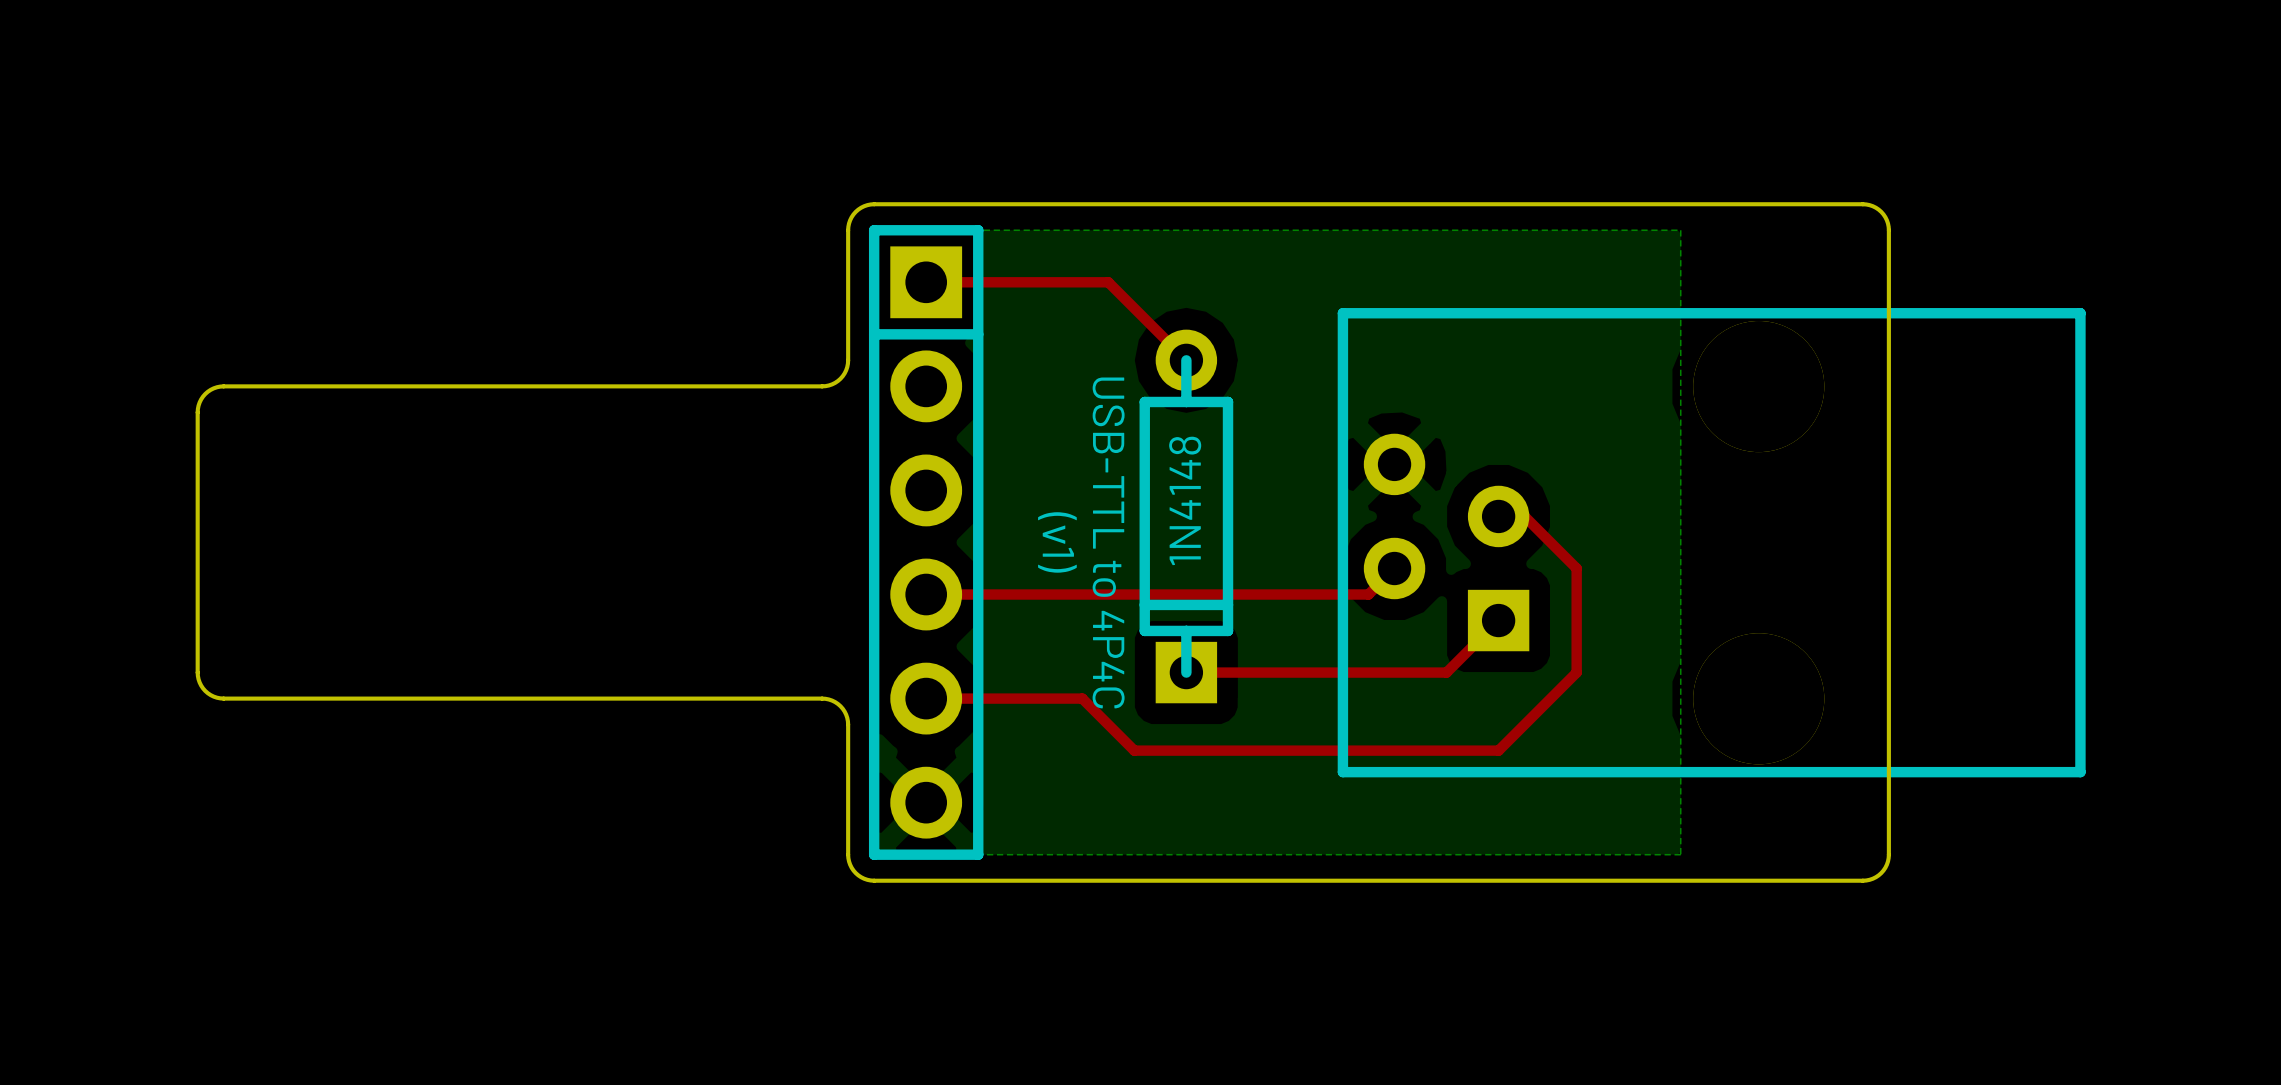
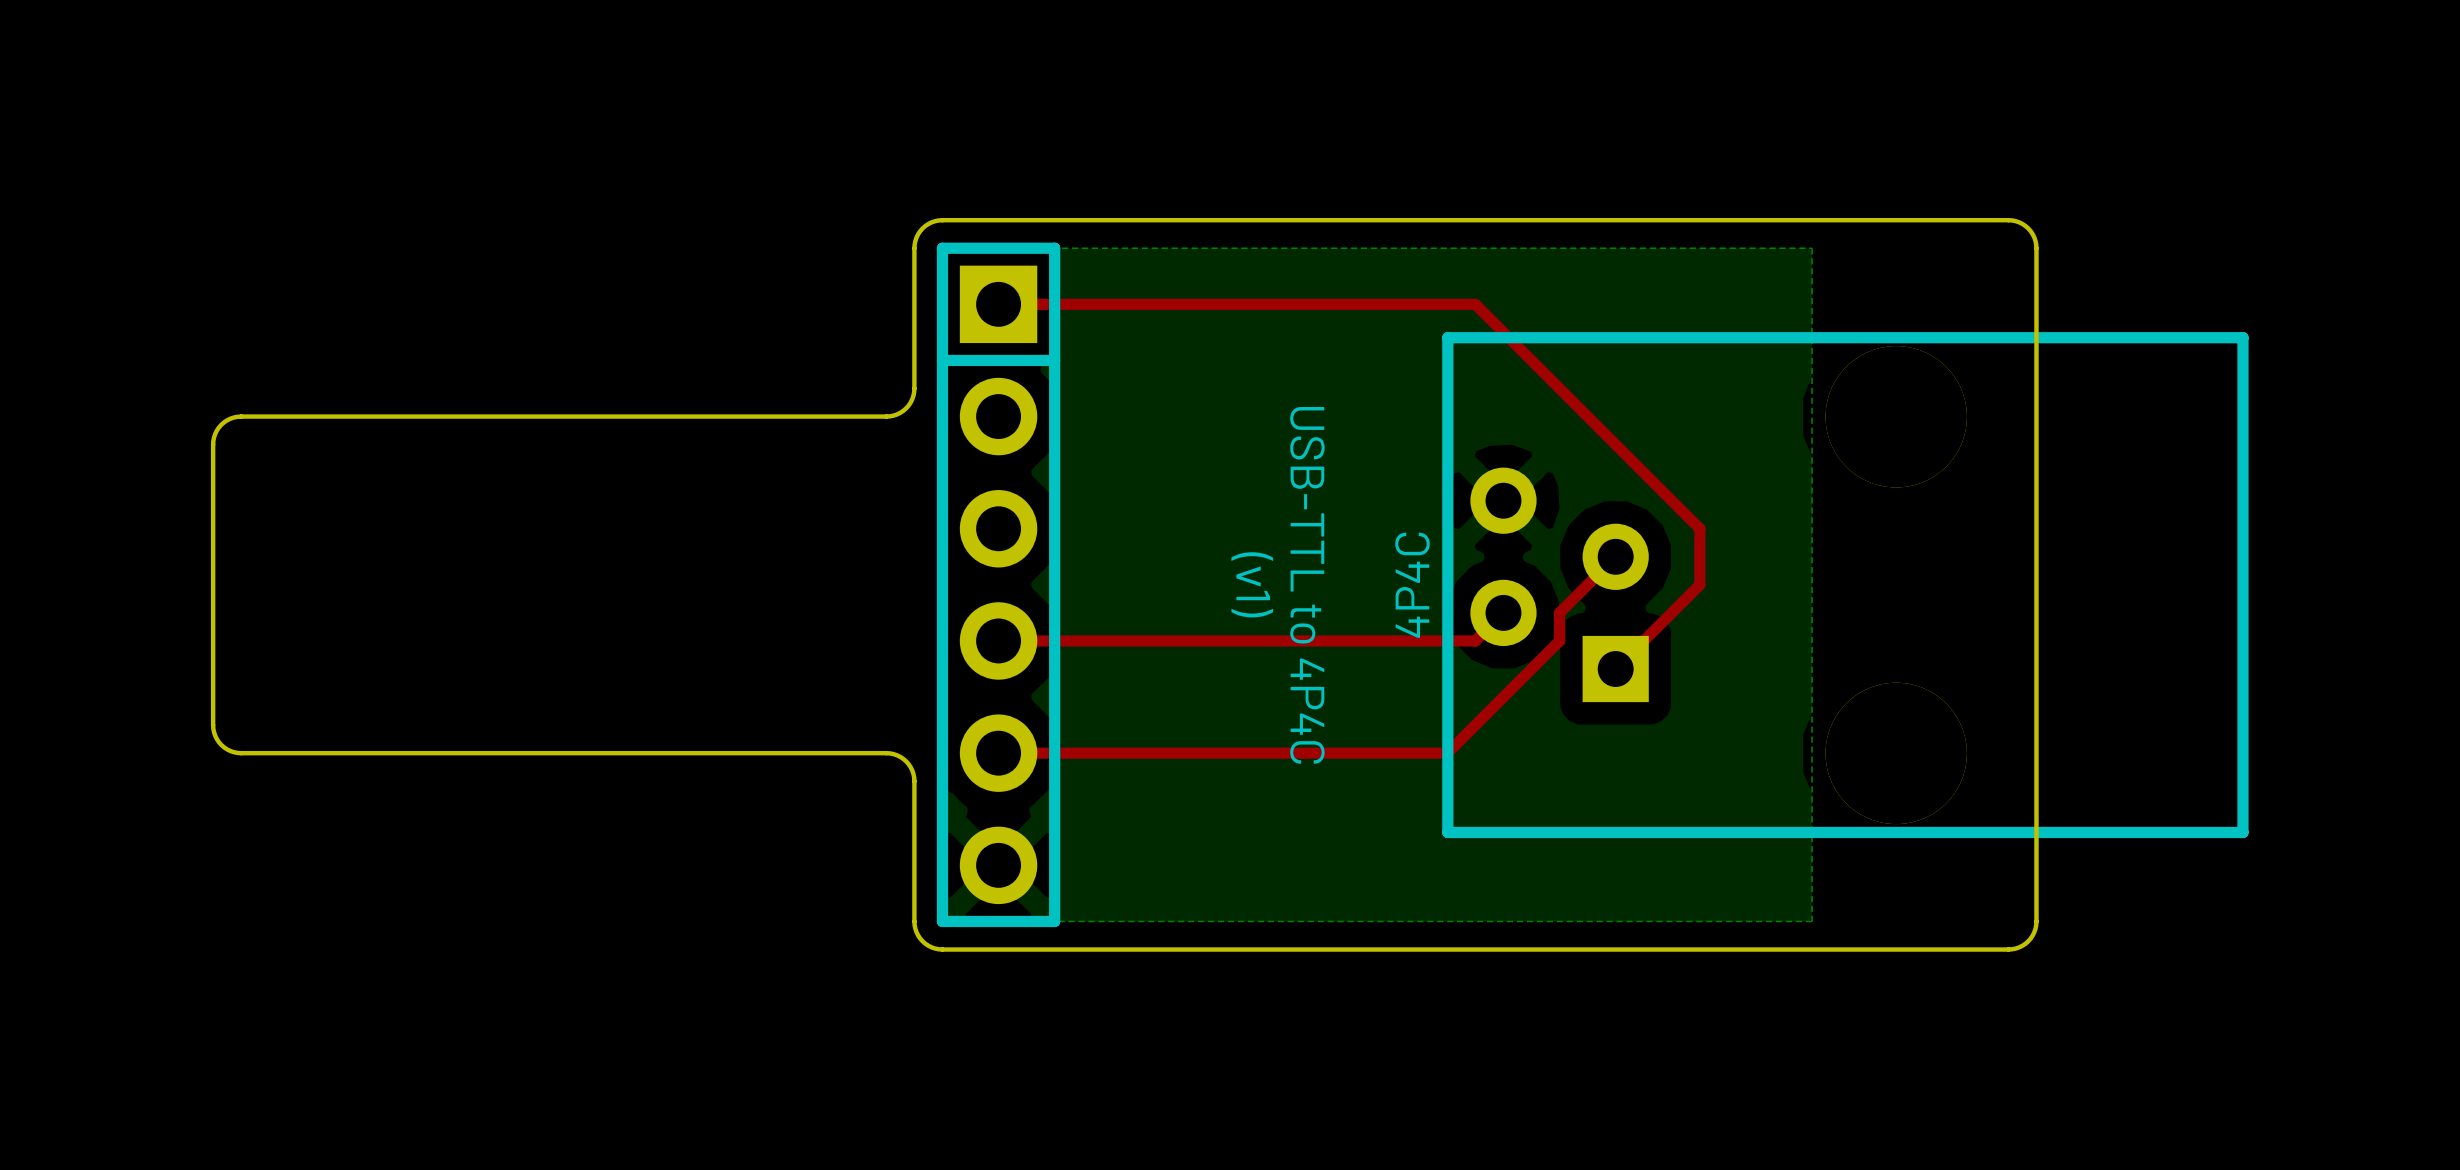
top track: (1108, 282) (1186, 360) -> none
part: 1N4148 (1186, 516) -> none
top track: (1498, 516) (1524, 516) (1576, 568) (1576, 672) (1498, 750) (1134, 750) (1082, 698) -> (1615, 556) (1559, 612) (1559, 640) (1447, 753) (1166, 753)
text position: (v1) (1057, 542) -> (v1) (1252, 584)
text position: USB-TTL to 4P4C (1108, 542) -> USB-TTL to 4P4C (1307, 585)
part value: none -> 4P4C (1412, 585)
top track: (1498, 620) (1446, 672) (1186, 672) -> (1615, 669) (1699, 584) (1699, 528) (1475, 304) (1194, 304)

